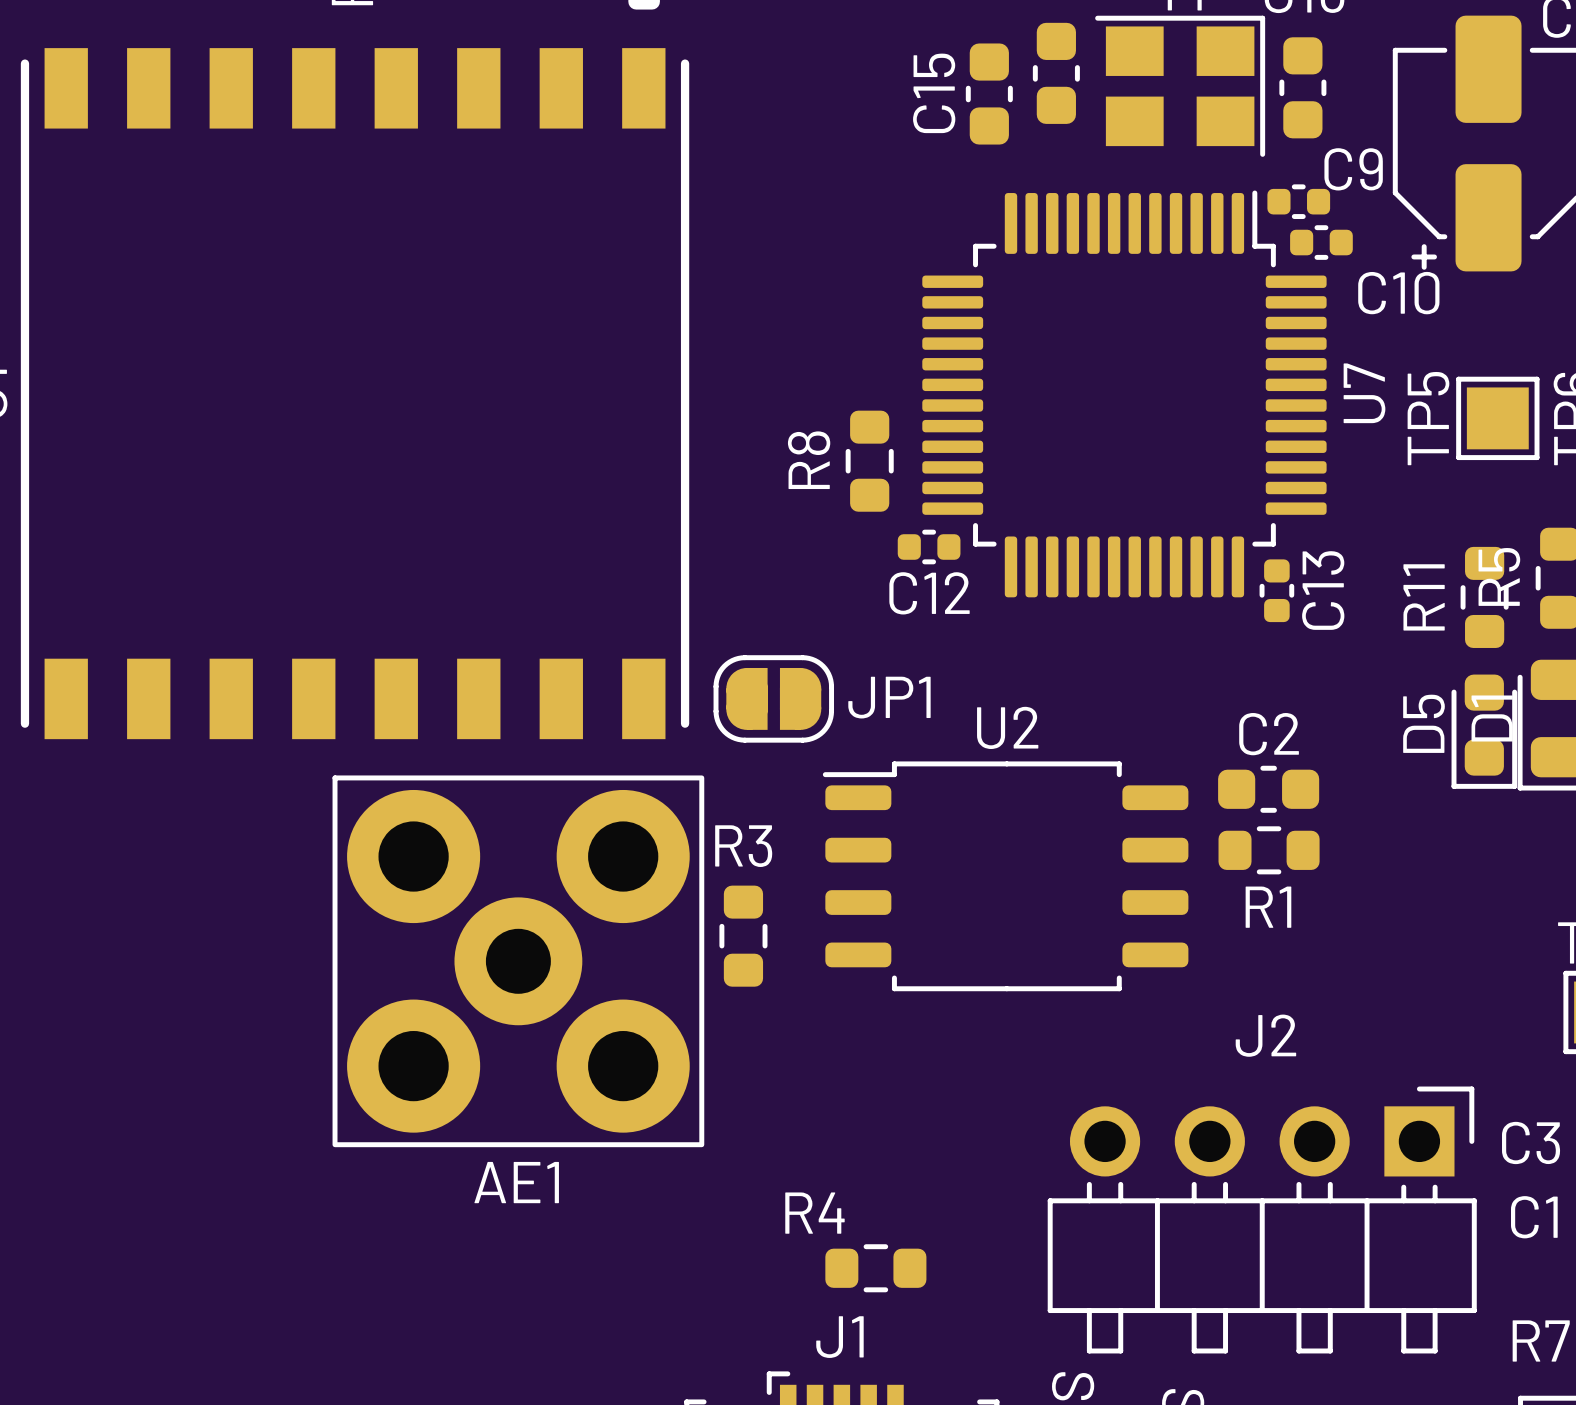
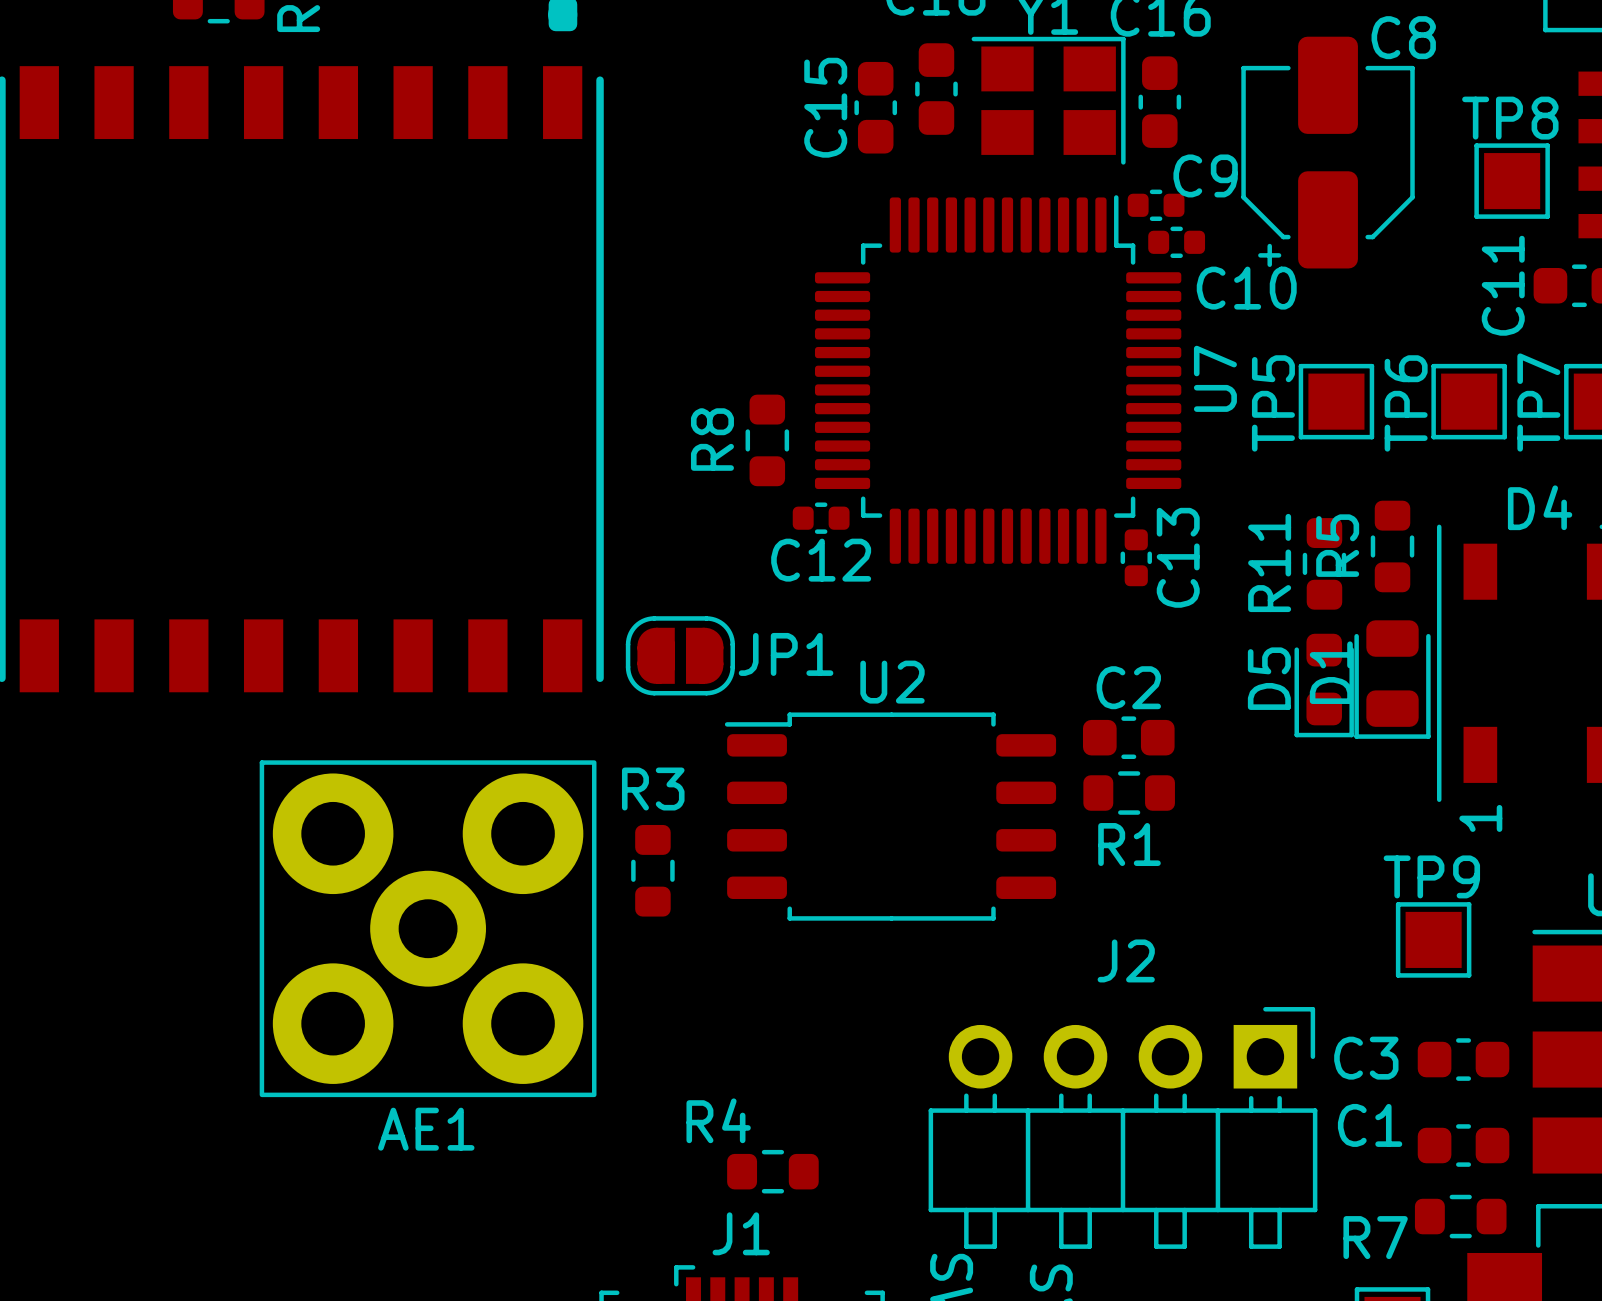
AE1 position: (518, 961) -> (428, 928)

